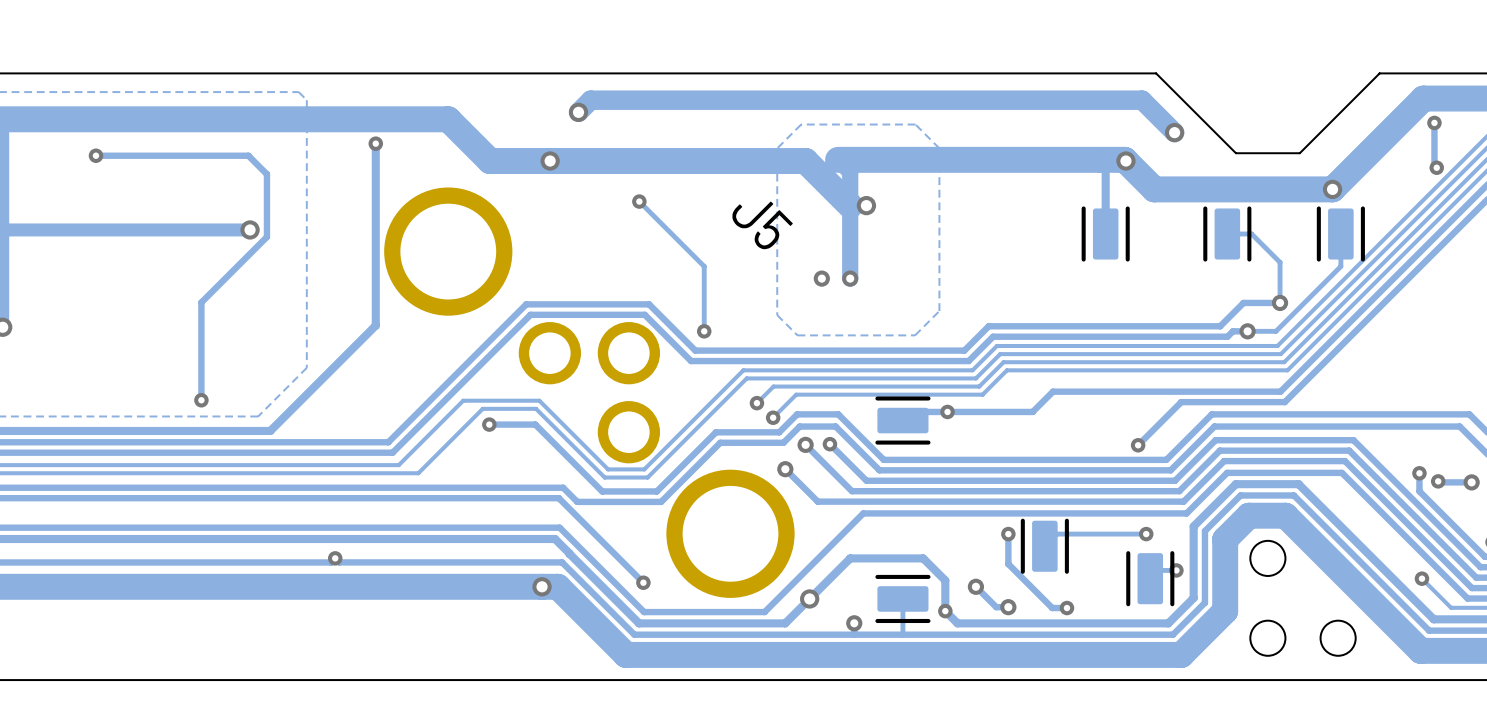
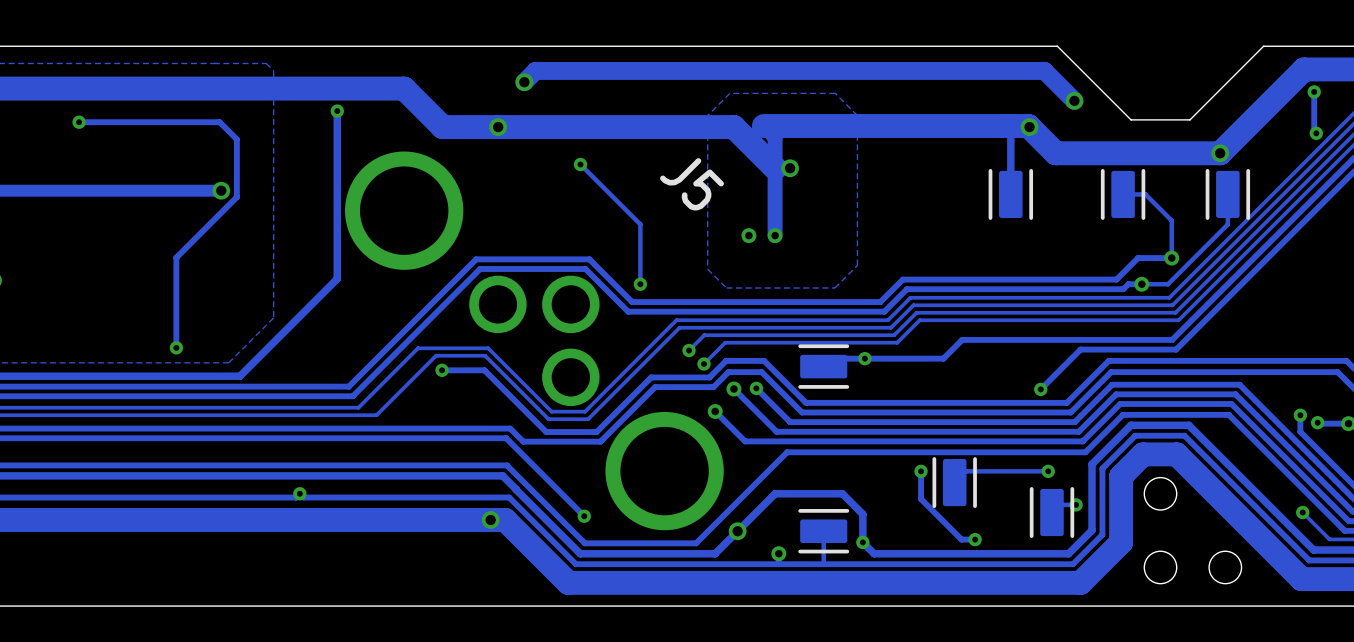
track: (975, 586) (996, 607) (1008, 607) -> none
via: (975, 586) -> none
via: (1008, 607) -> none

